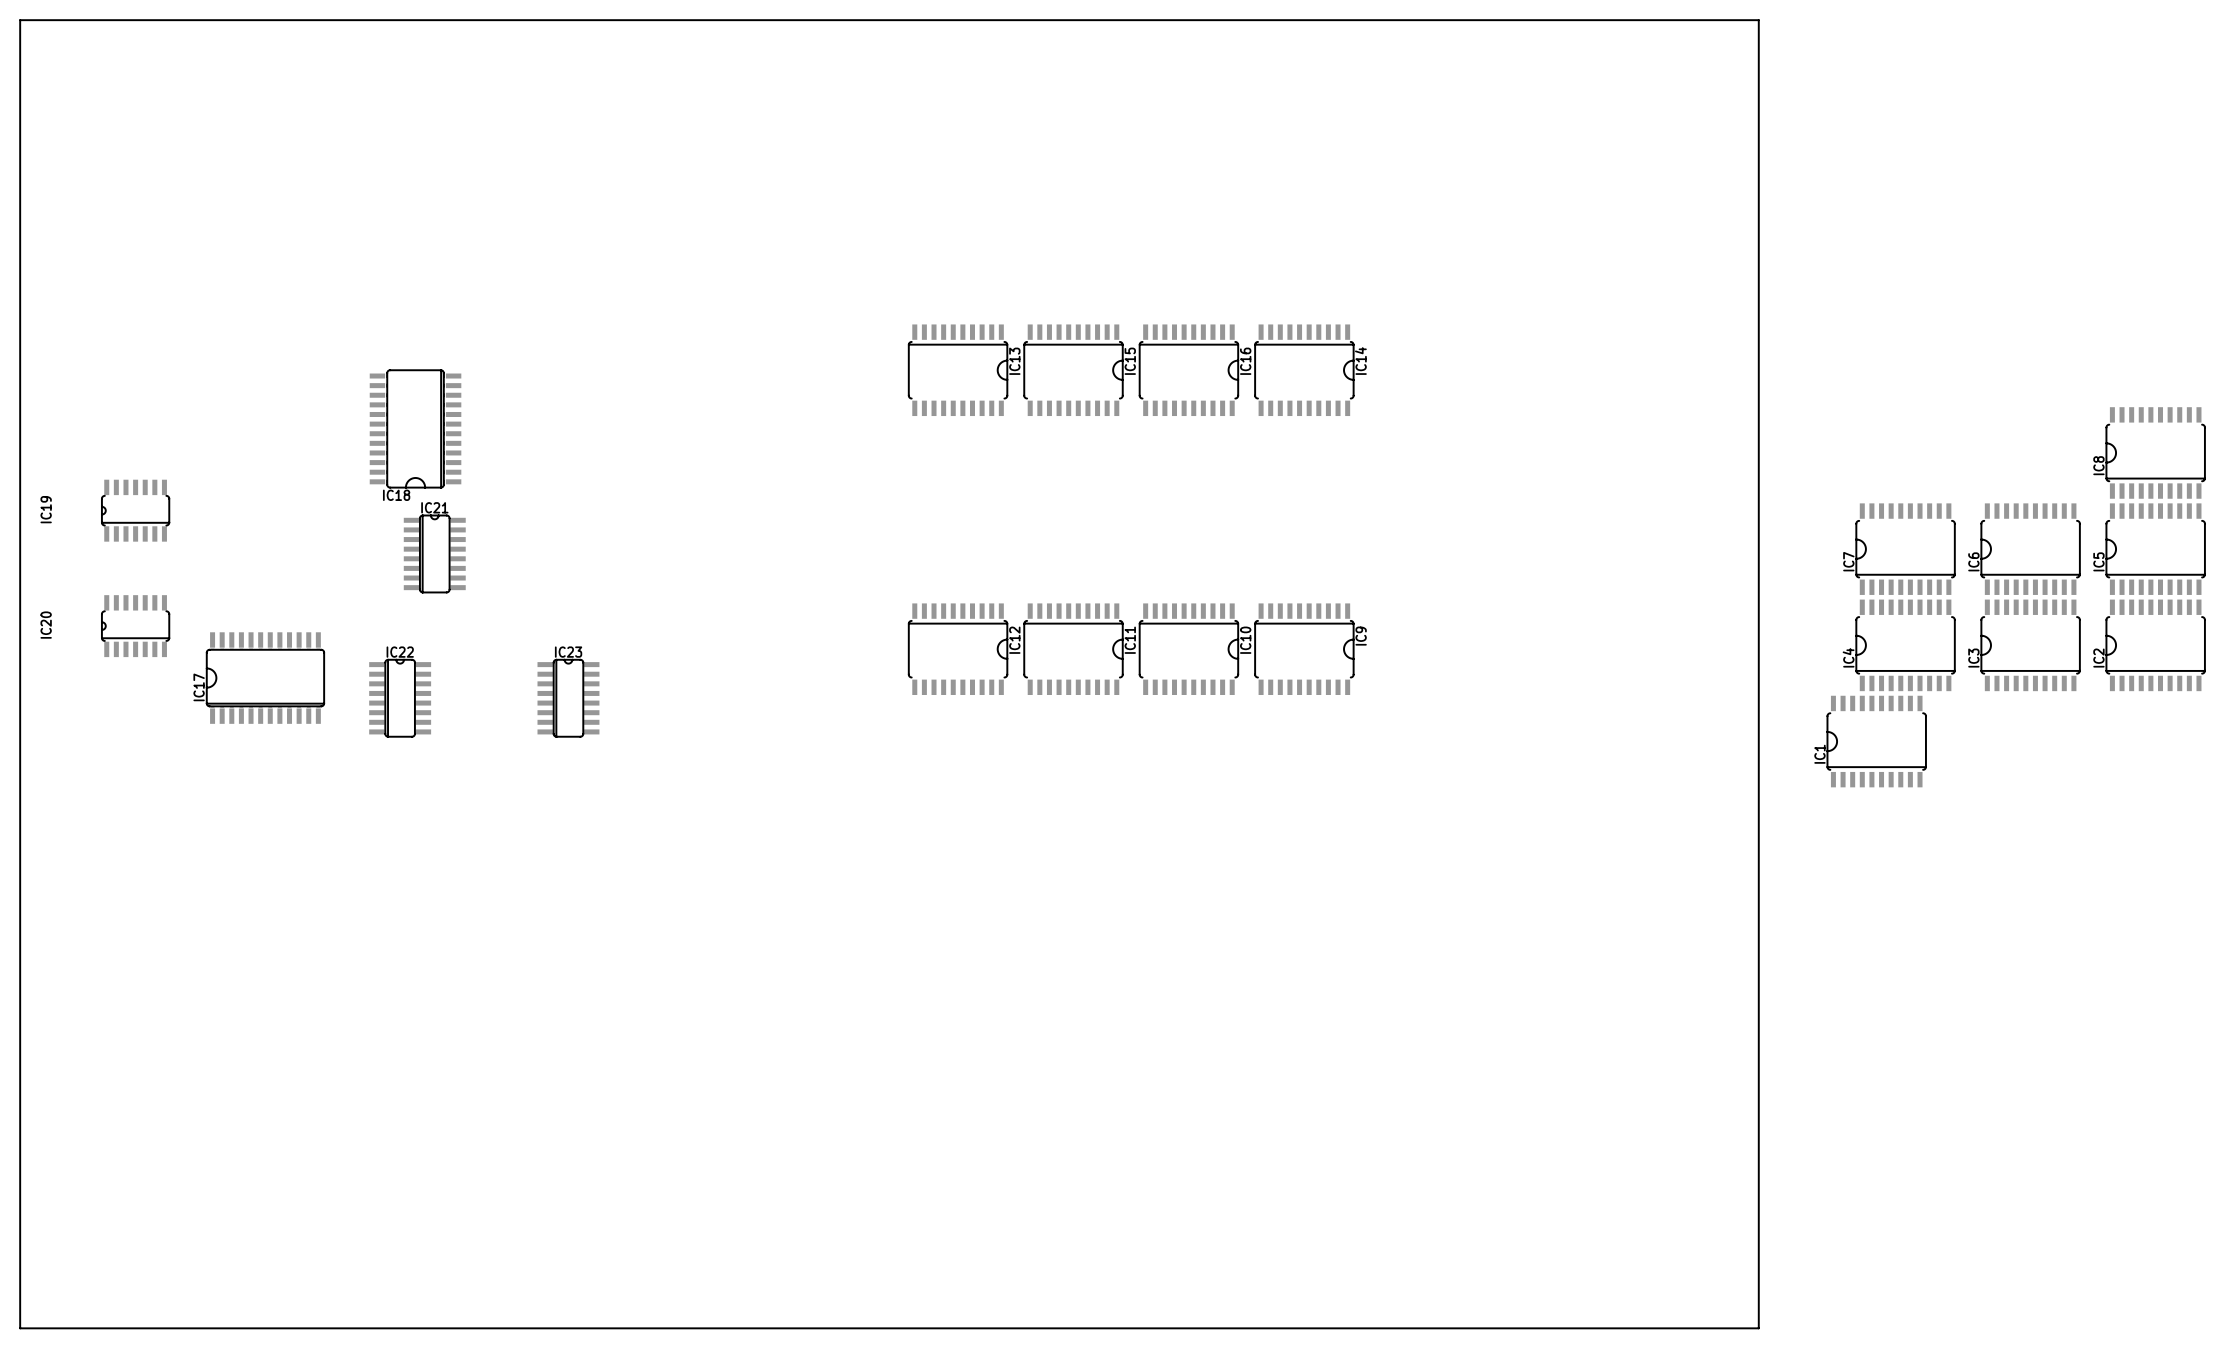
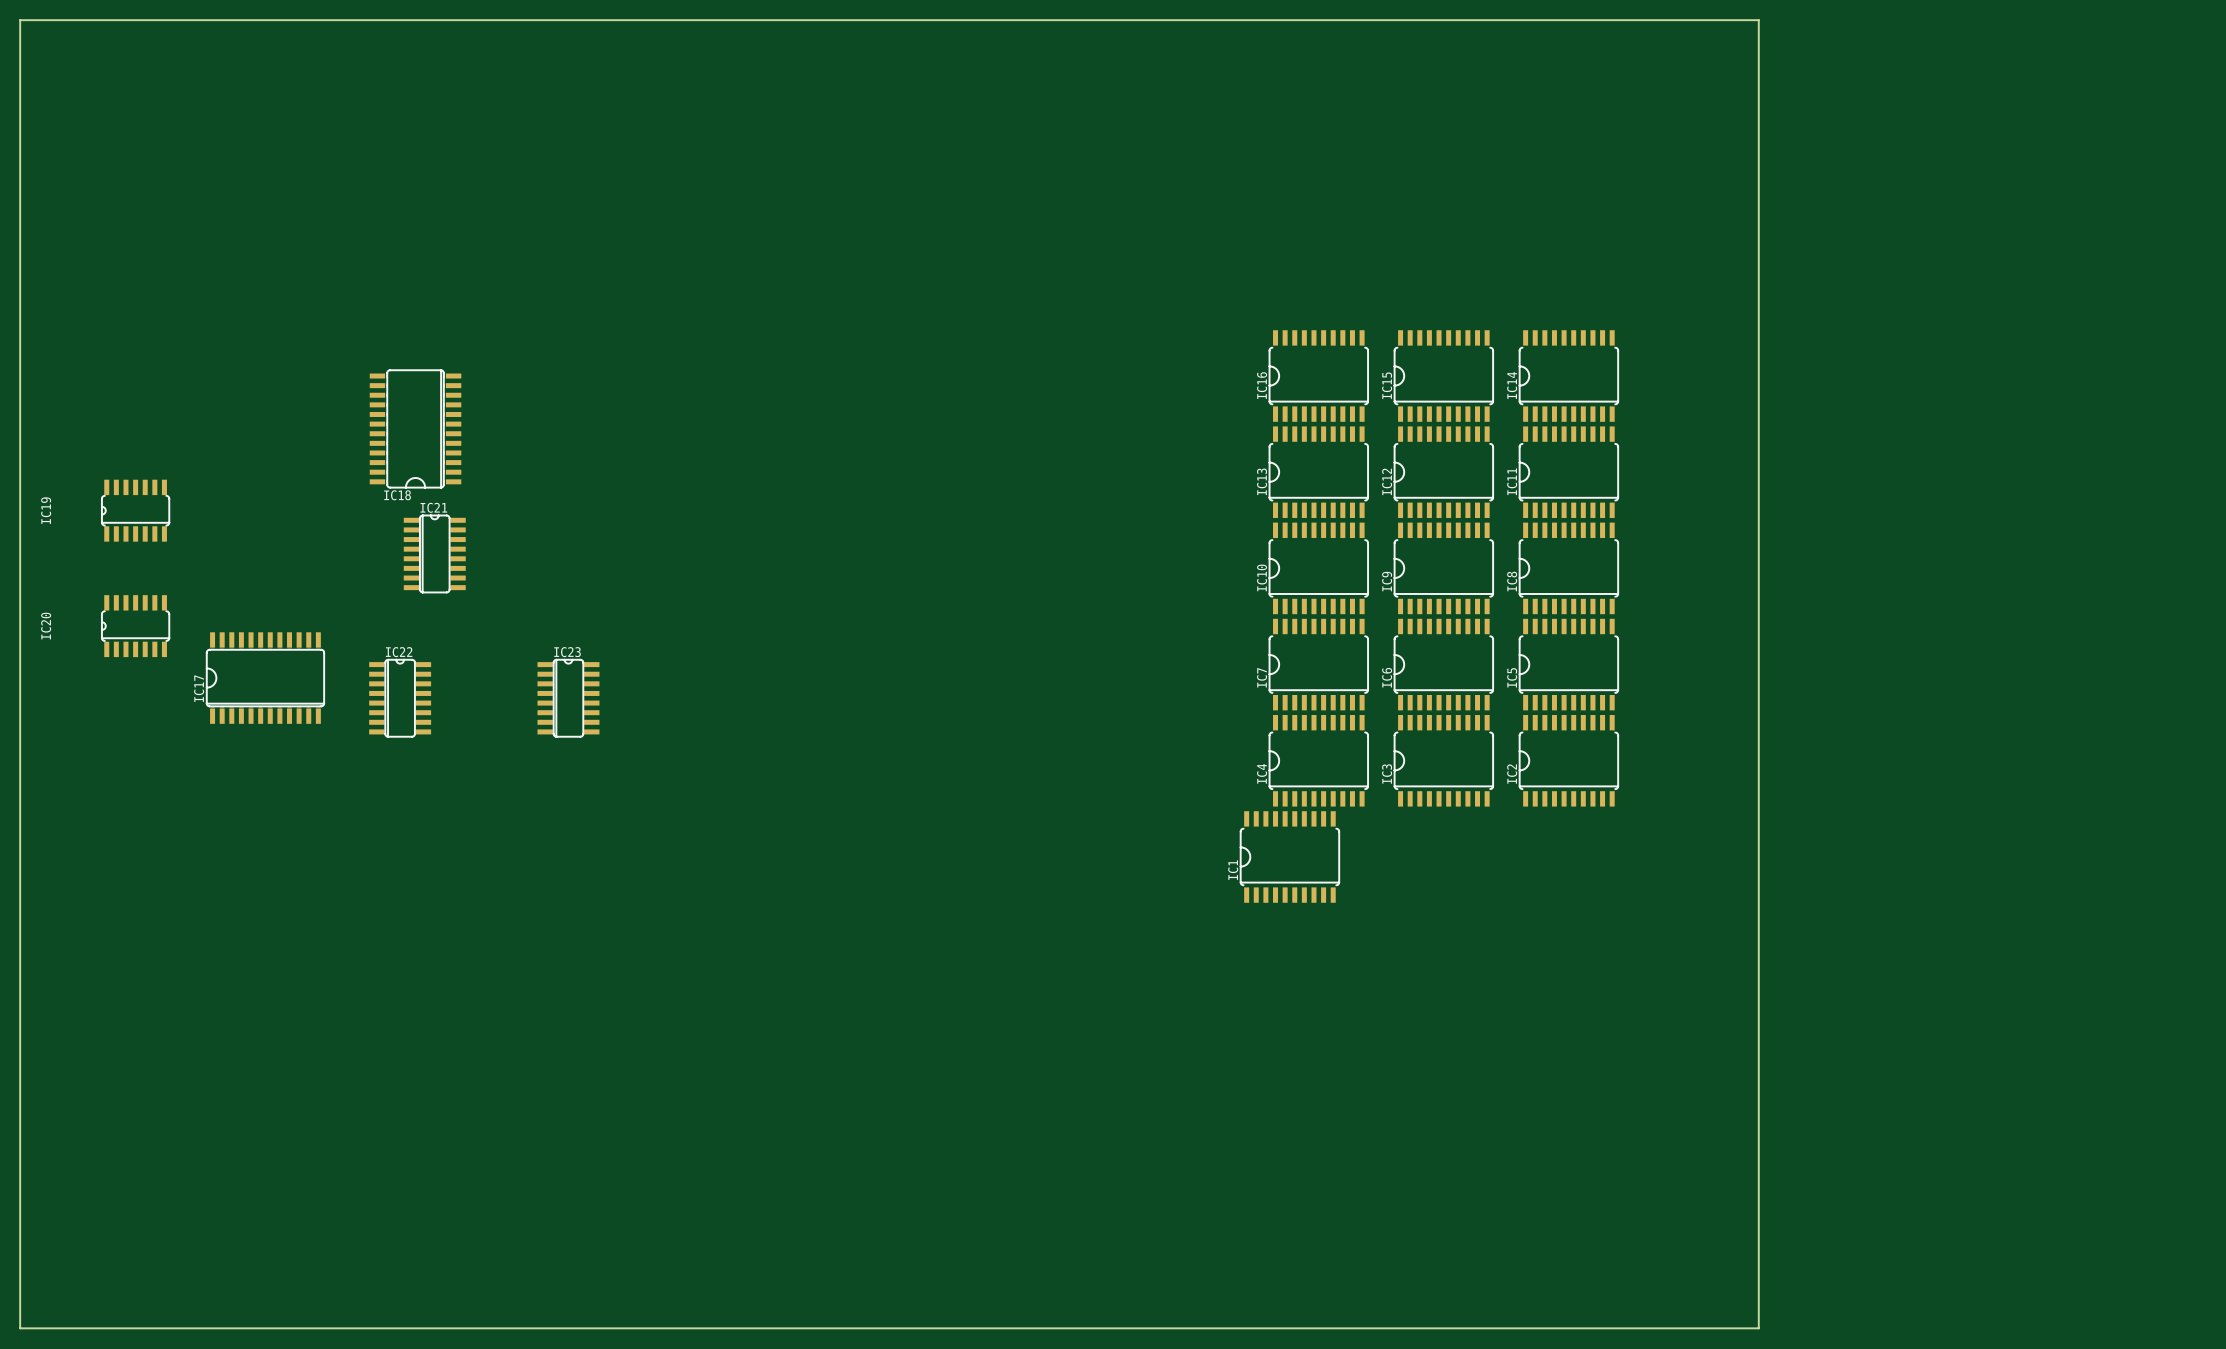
IC13 rotation: 0° (958, 370) -> 180° (1318, 472)
IC13 position: (958, 370) -> (1318, 472)
IC15 rotation: 0° (1073, 370) -> 180° (1443, 376)
IC15 position: (1073, 370) -> (1443, 376)
IC16 rotation: 0° (1188, 370) -> 180° (1318, 376)
IC16 position: (1188, 370) -> (1318, 376)
IC14 rotation: 0° (1304, 370) -> 180° (1568, 376)
IC14 position: (1304, 370) -> (1568, 376)
IC8 position: (2155, 452) -> (1568, 568)
IC7 position: (1905, 549) -> (1318, 664)
IC6 position: (2030, 549) -> (1443, 664)
IC5 position: (2155, 549) -> (1568, 664)
IC4 position: (1905, 645) -> (1318, 760)
IC3 position: (2030, 645) -> (1443, 760)
IC2 position: (2155, 645) -> (1568, 760)
IC12 rotation: 0° (958, 649) -> 180° (1443, 472)
IC12 position: (958, 649) -> (1443, 472)
IC11 rotation: 0° (1073, 649) -> 180° (1568, 472)
IC11 position: (1073, 649) -> (1568, 472)
IC10 rotation: 0° (1188, 649) -> 180° (1318, 568)
IC10 position: (1188, 649) -> (1318, 568)
IC9 rotation: 0° (1304, 649) -> 180° (1443, 568)
IC9 position: (1304, 649) -> (1443, 568)
IC1 position: (1876, 741) -> (1289, 856)

